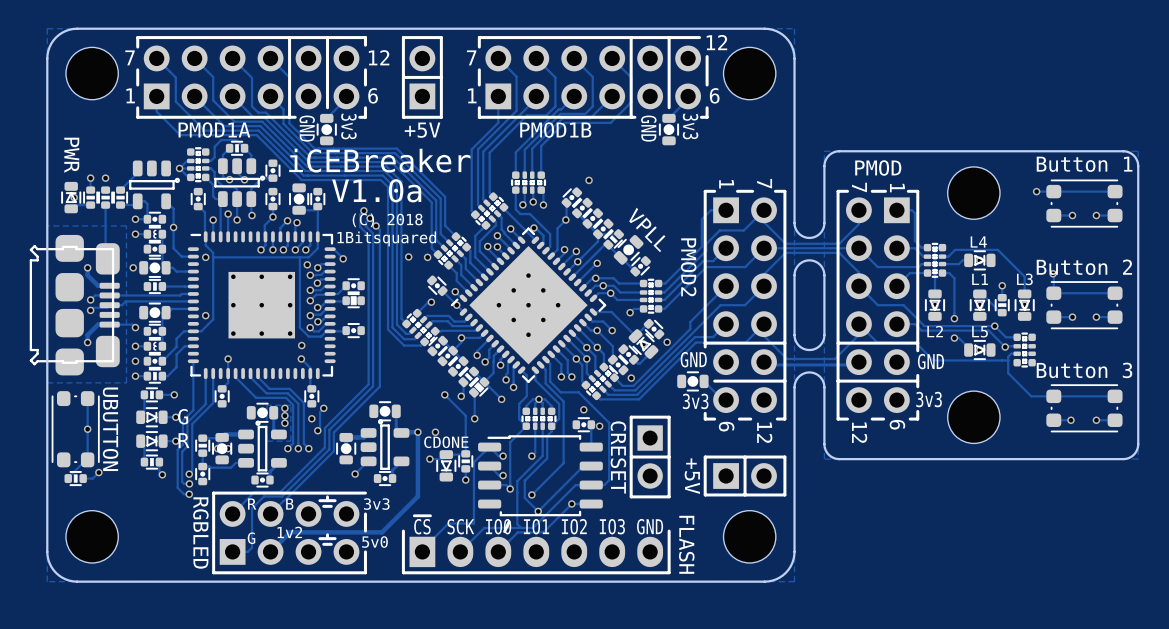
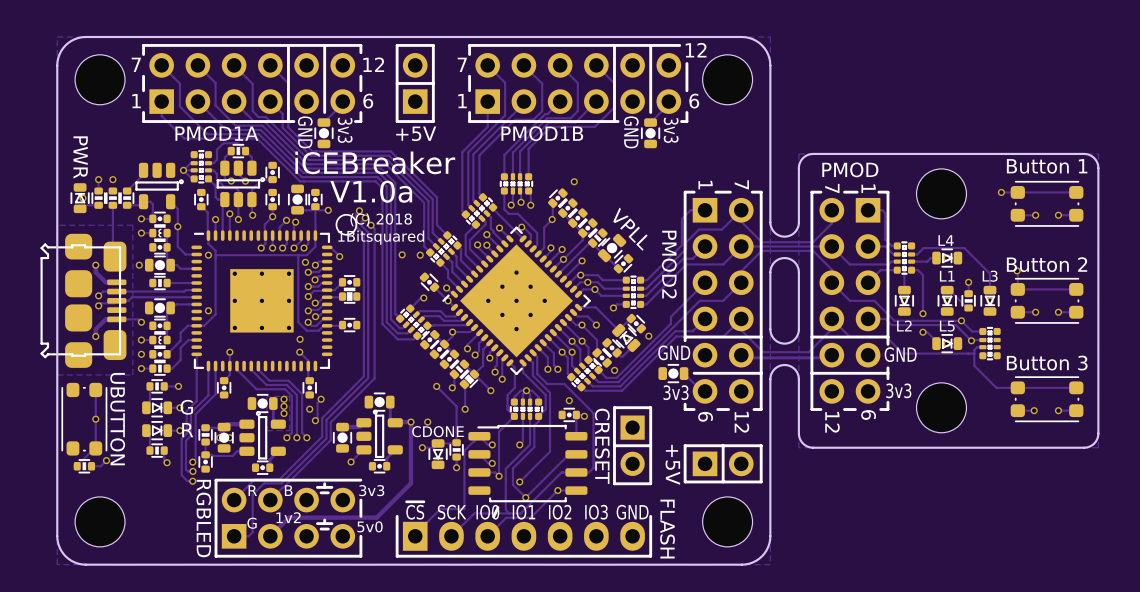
track: none -> (315, 206) (318, 210) (328, 210)
via: none -> (328, 210)
part: none -> (346, 224)

